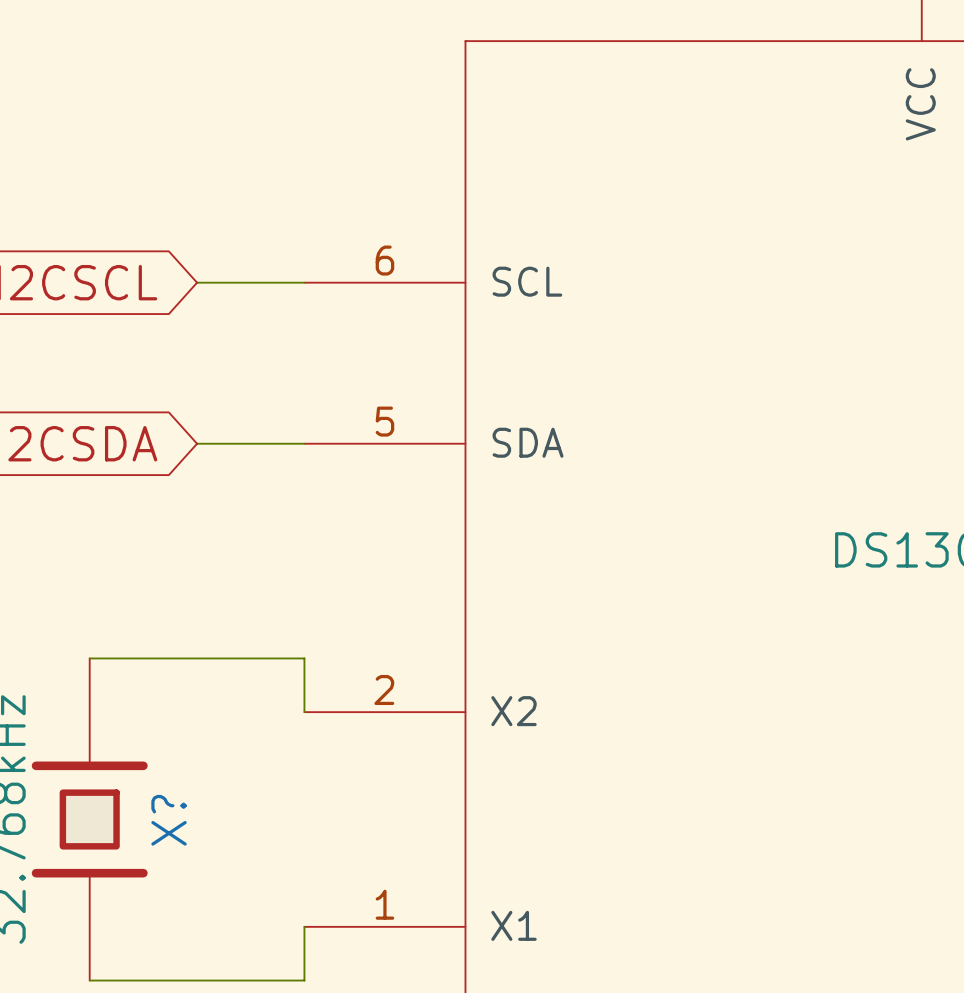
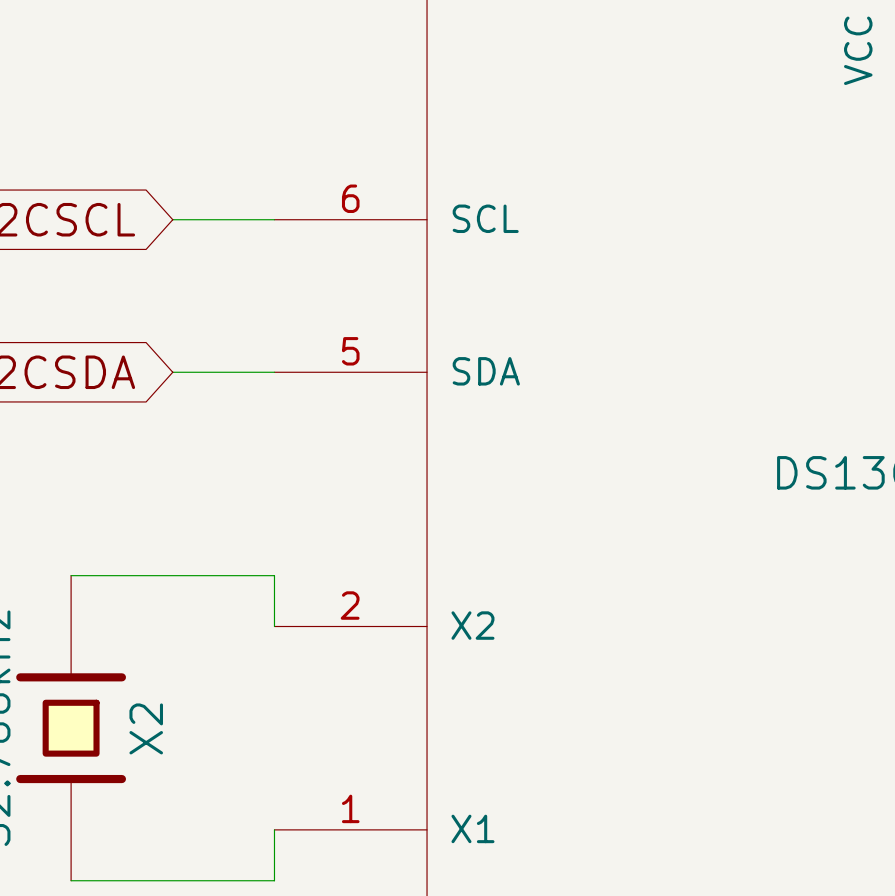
X? name: X? (169, 820) -> X2 (146, 728)

